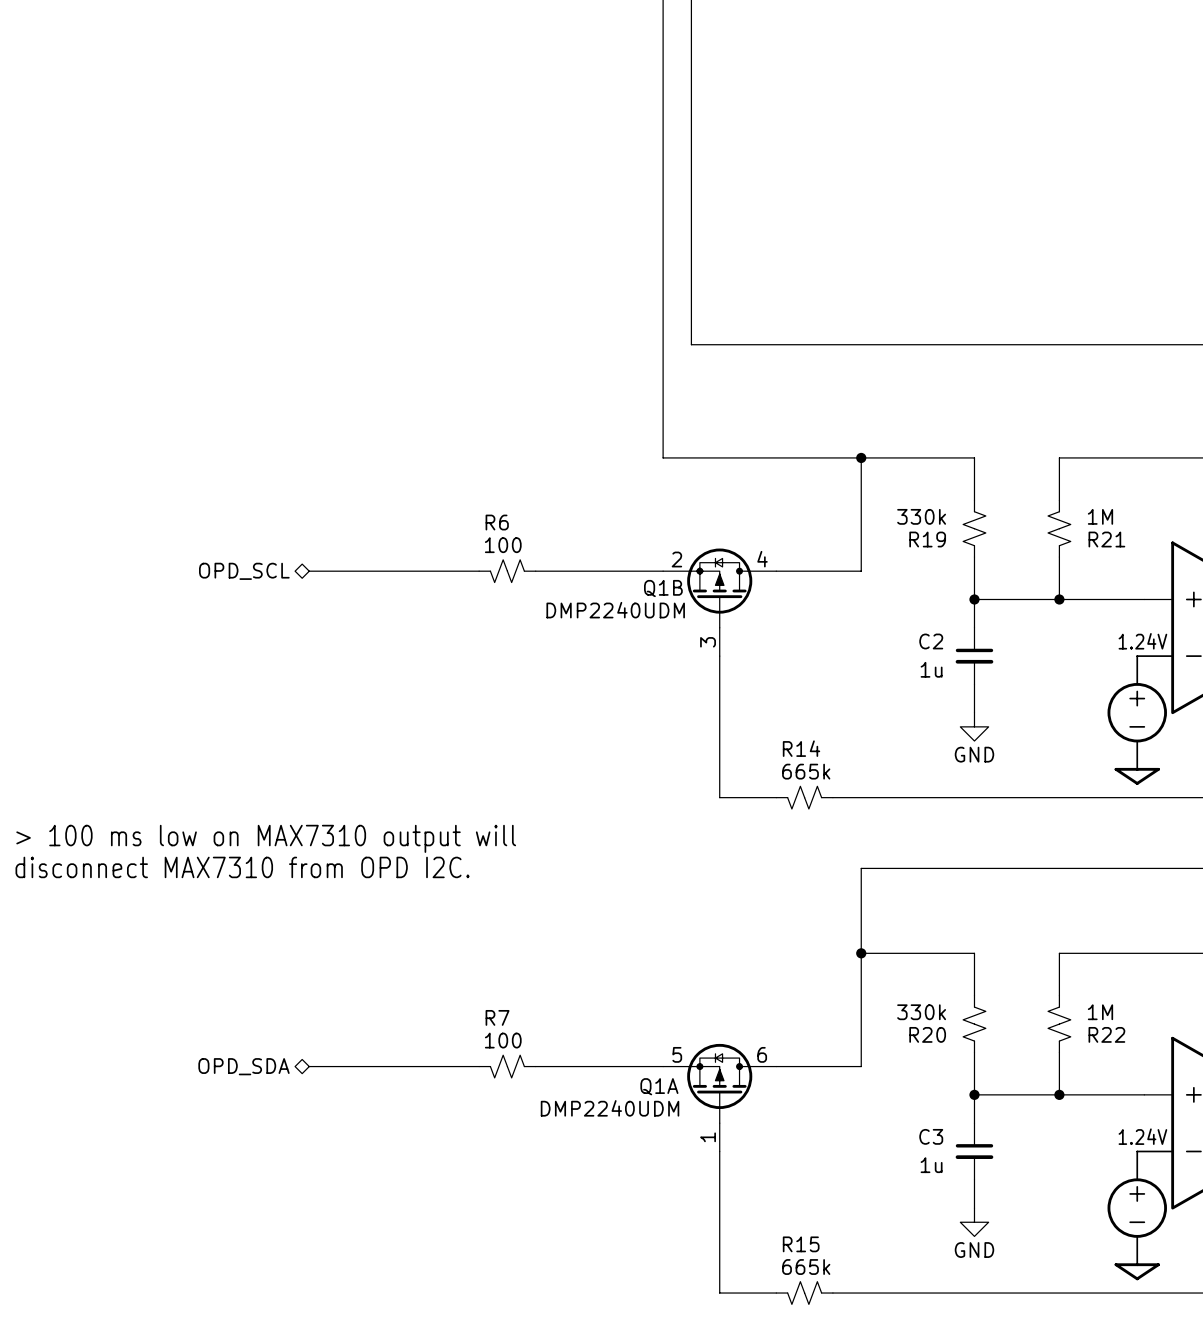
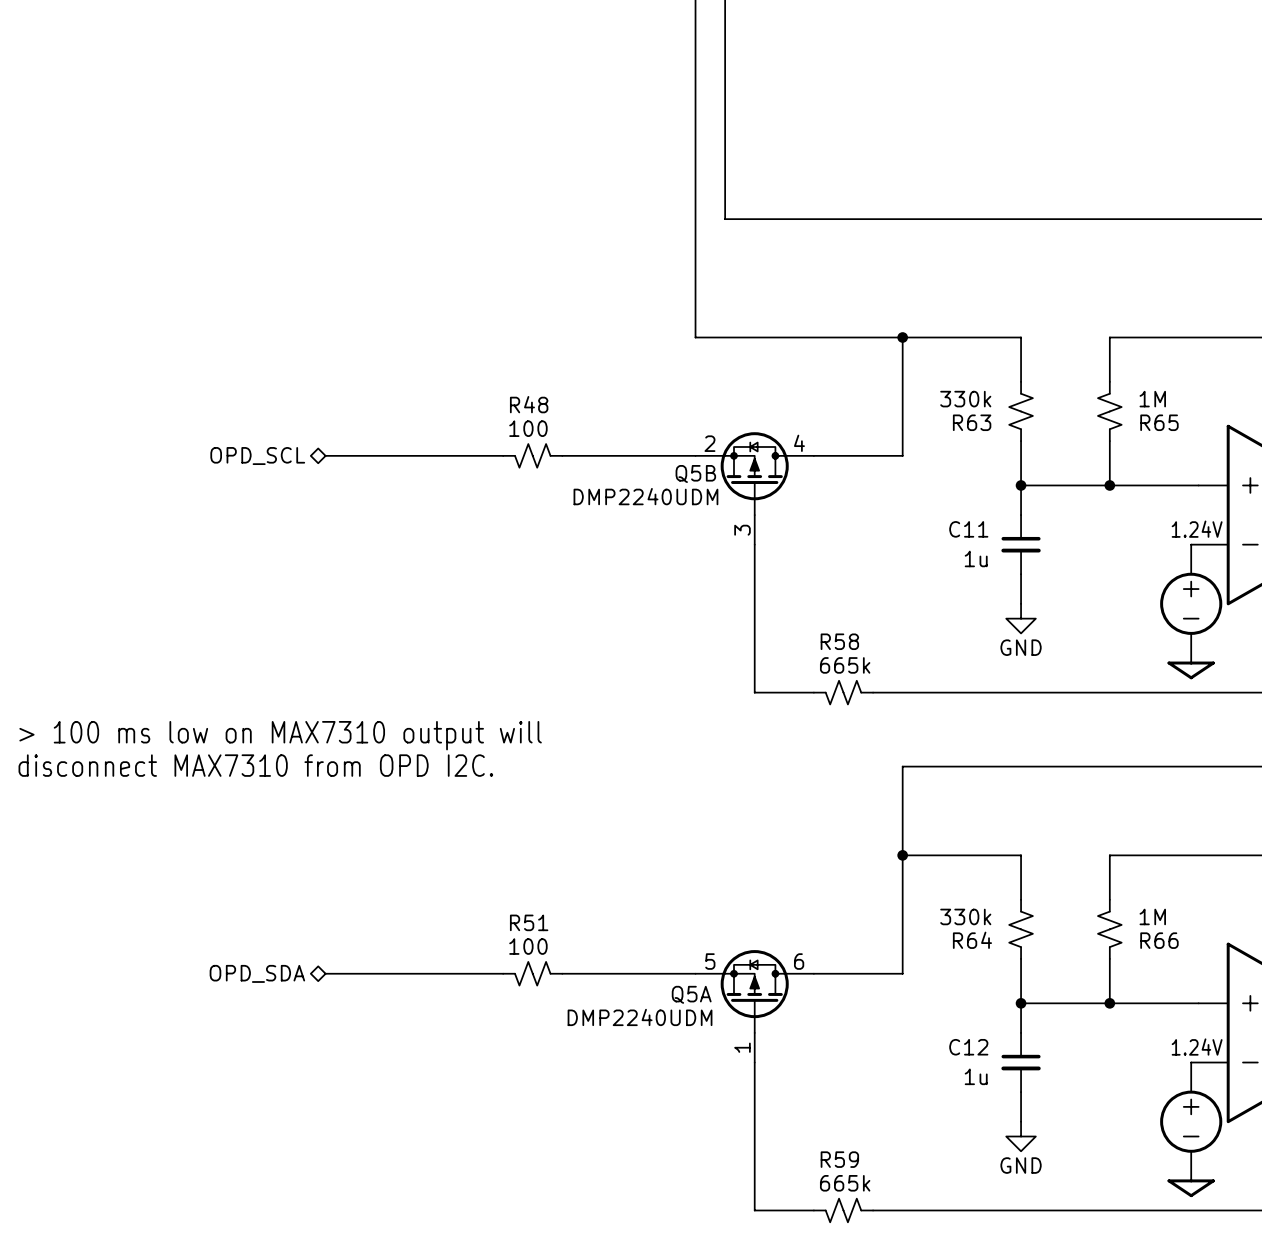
R6 name: R6 (497, 522) -> R48 (529, 404)
R19 name: R19 (927, 539) -> R63 (972, 422)
R21 name: R21 (1106, 539) -> R65 (1159, 422)
Q1B name: Q1B (663, 588) -> Q5B (695, 474)
C2 name: C2 (931, 641) -> C11 (968, 529)
R14 name: R14 (801, 748) -> R58 (839, 641)
R7 name: R7 (497, 1017) -> R51 (529, 922)
R20 name: R20 (927, 1034) -> R64 (972, 940)
R22 name: R22 (1106, 1034) -> R66 (1159, 940)
Q1A name: Q1A (659, 1086) -> Q5A (691, 994)
C3 name: C3 (931, 1136) -> C12 (968, 1047)
R15 name: R15 (801, 1244) -> R59 (839, 1159)

